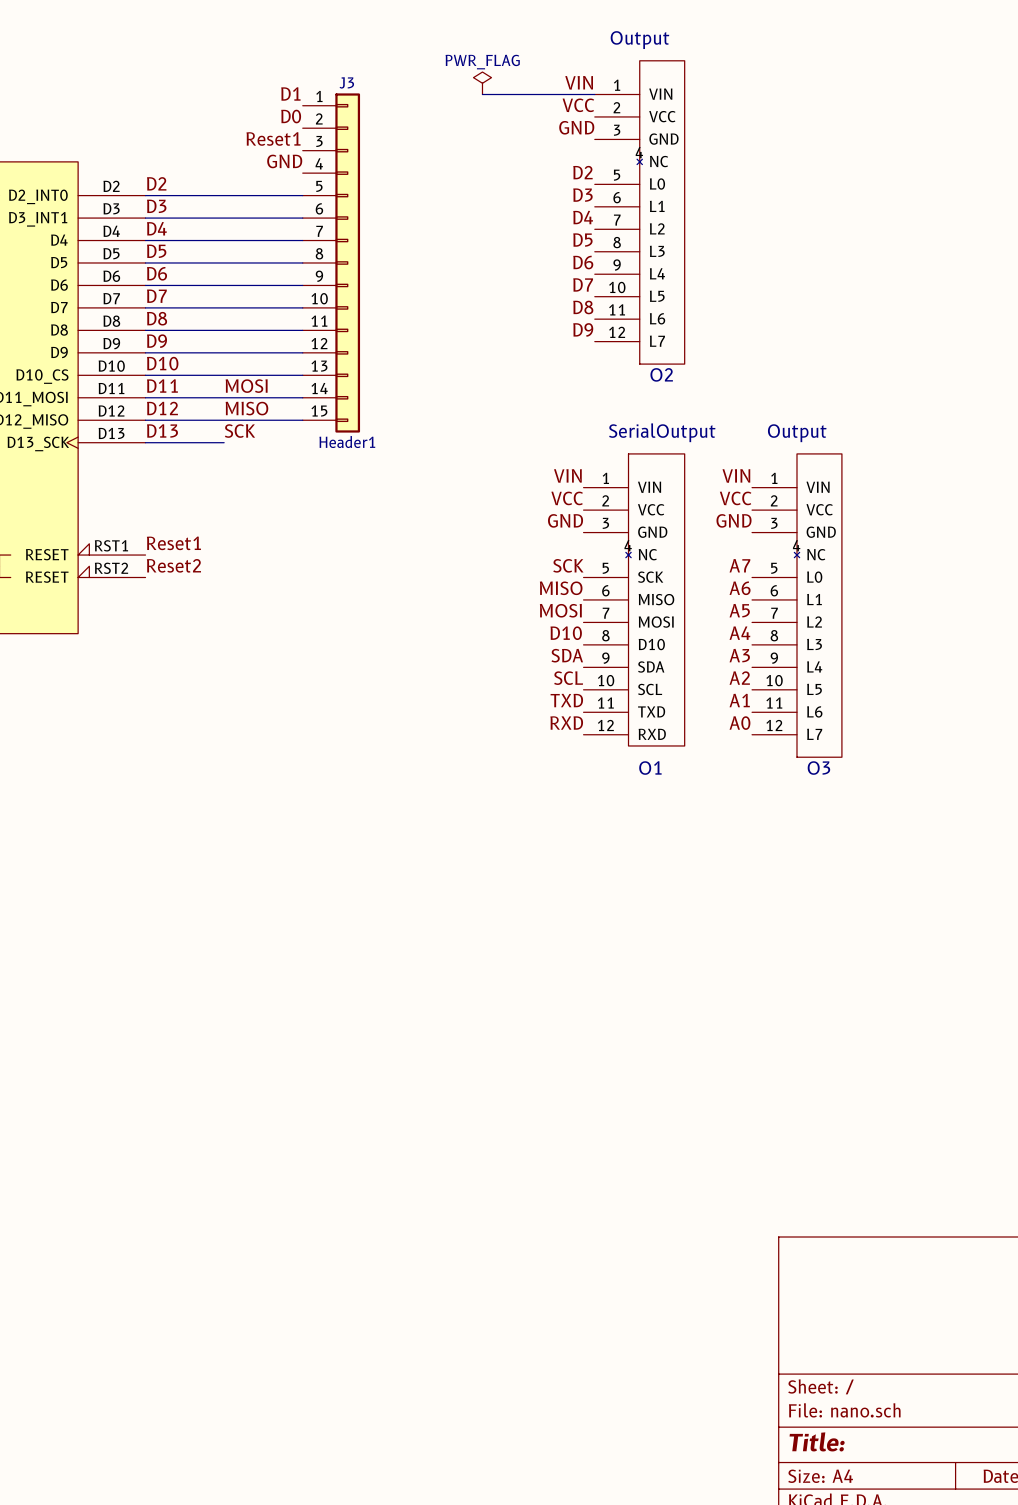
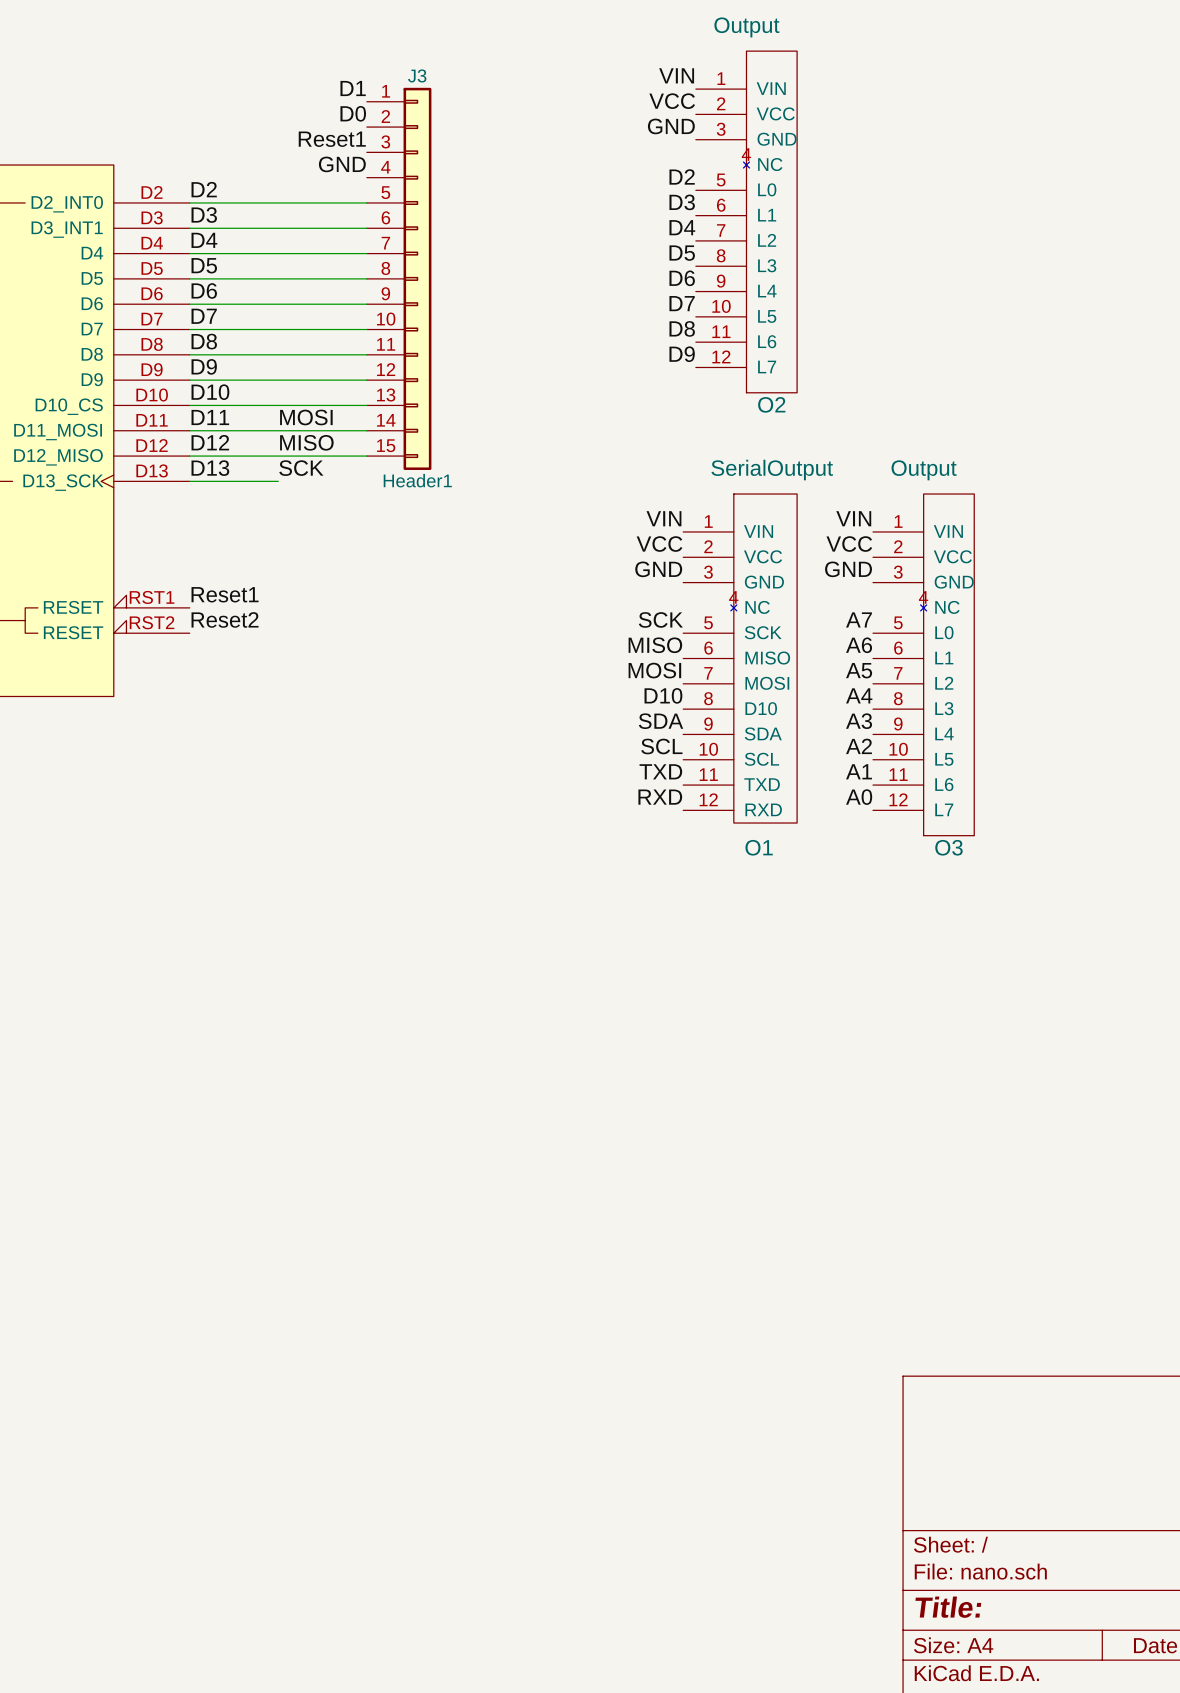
power symbol: PWR_FLAG (482, 83) -> none
wire: (482, 94) (594, 94) -> none

